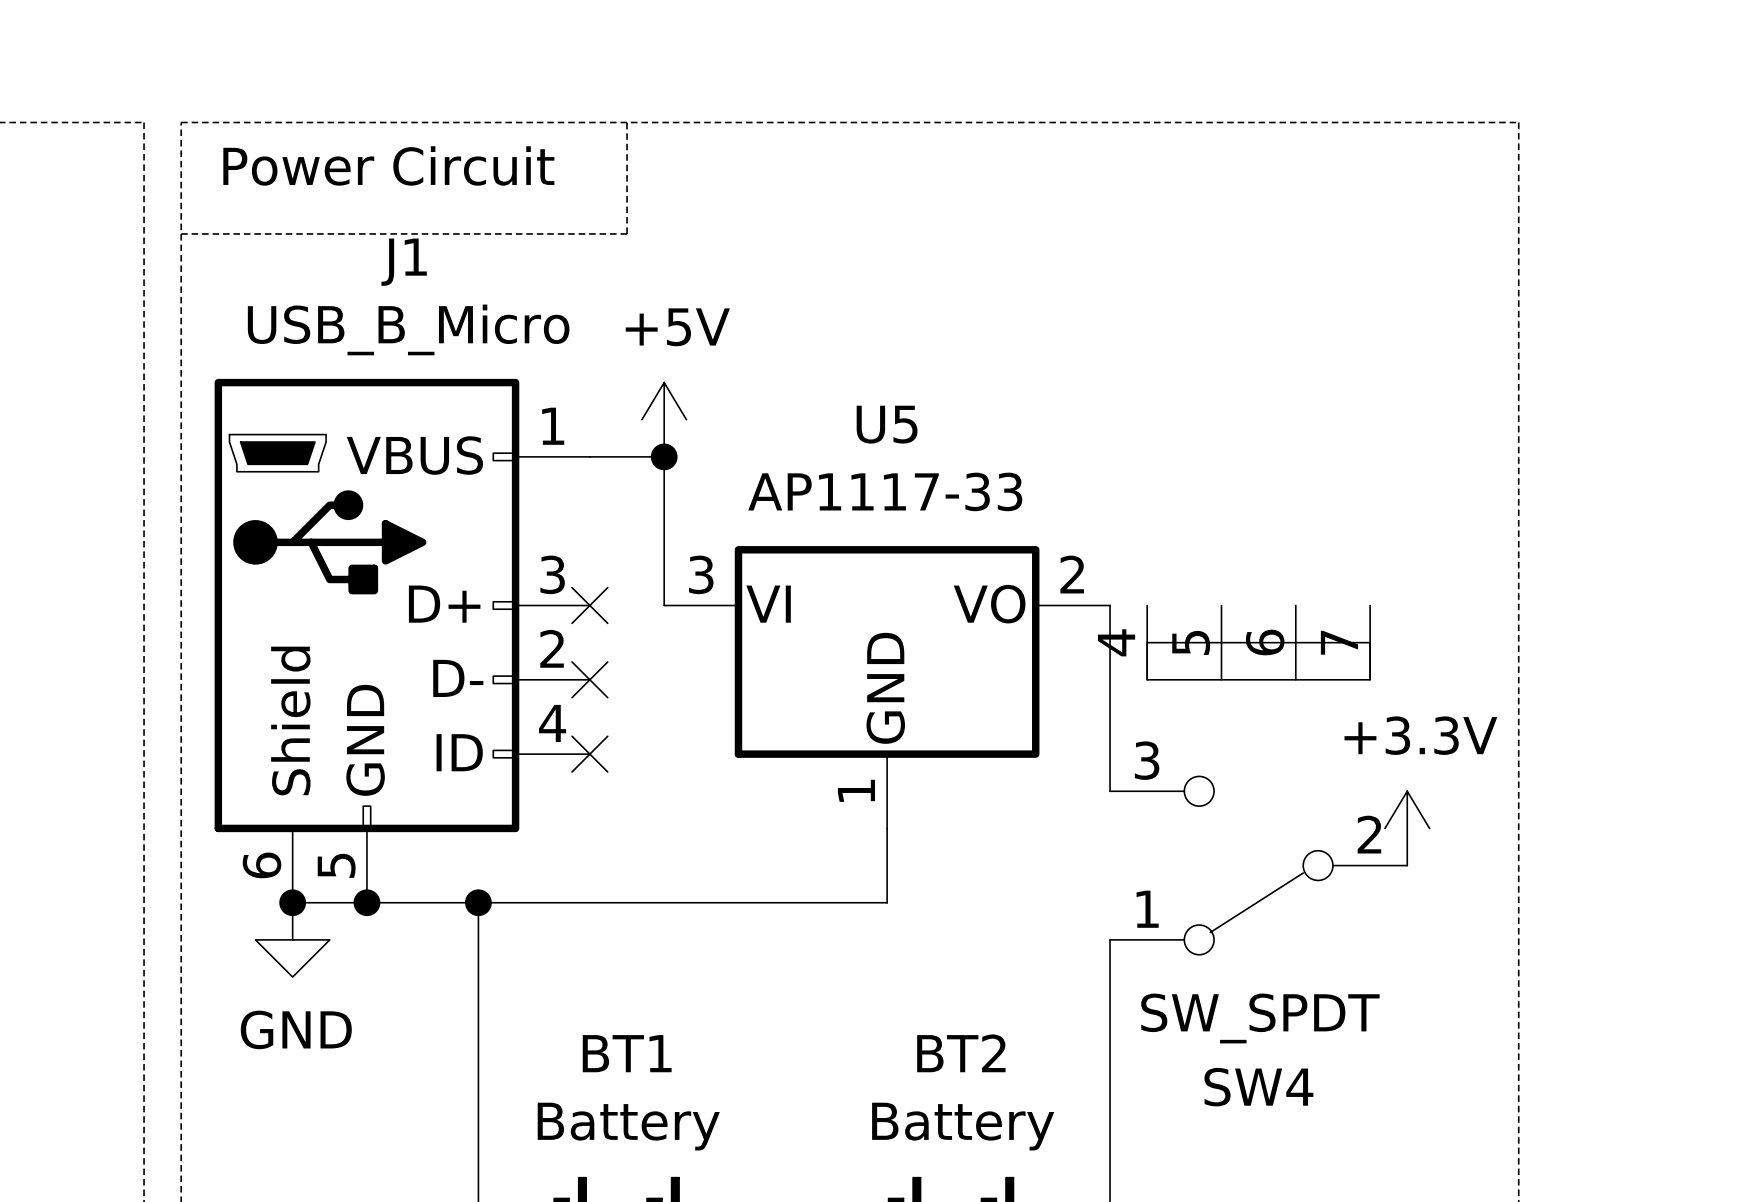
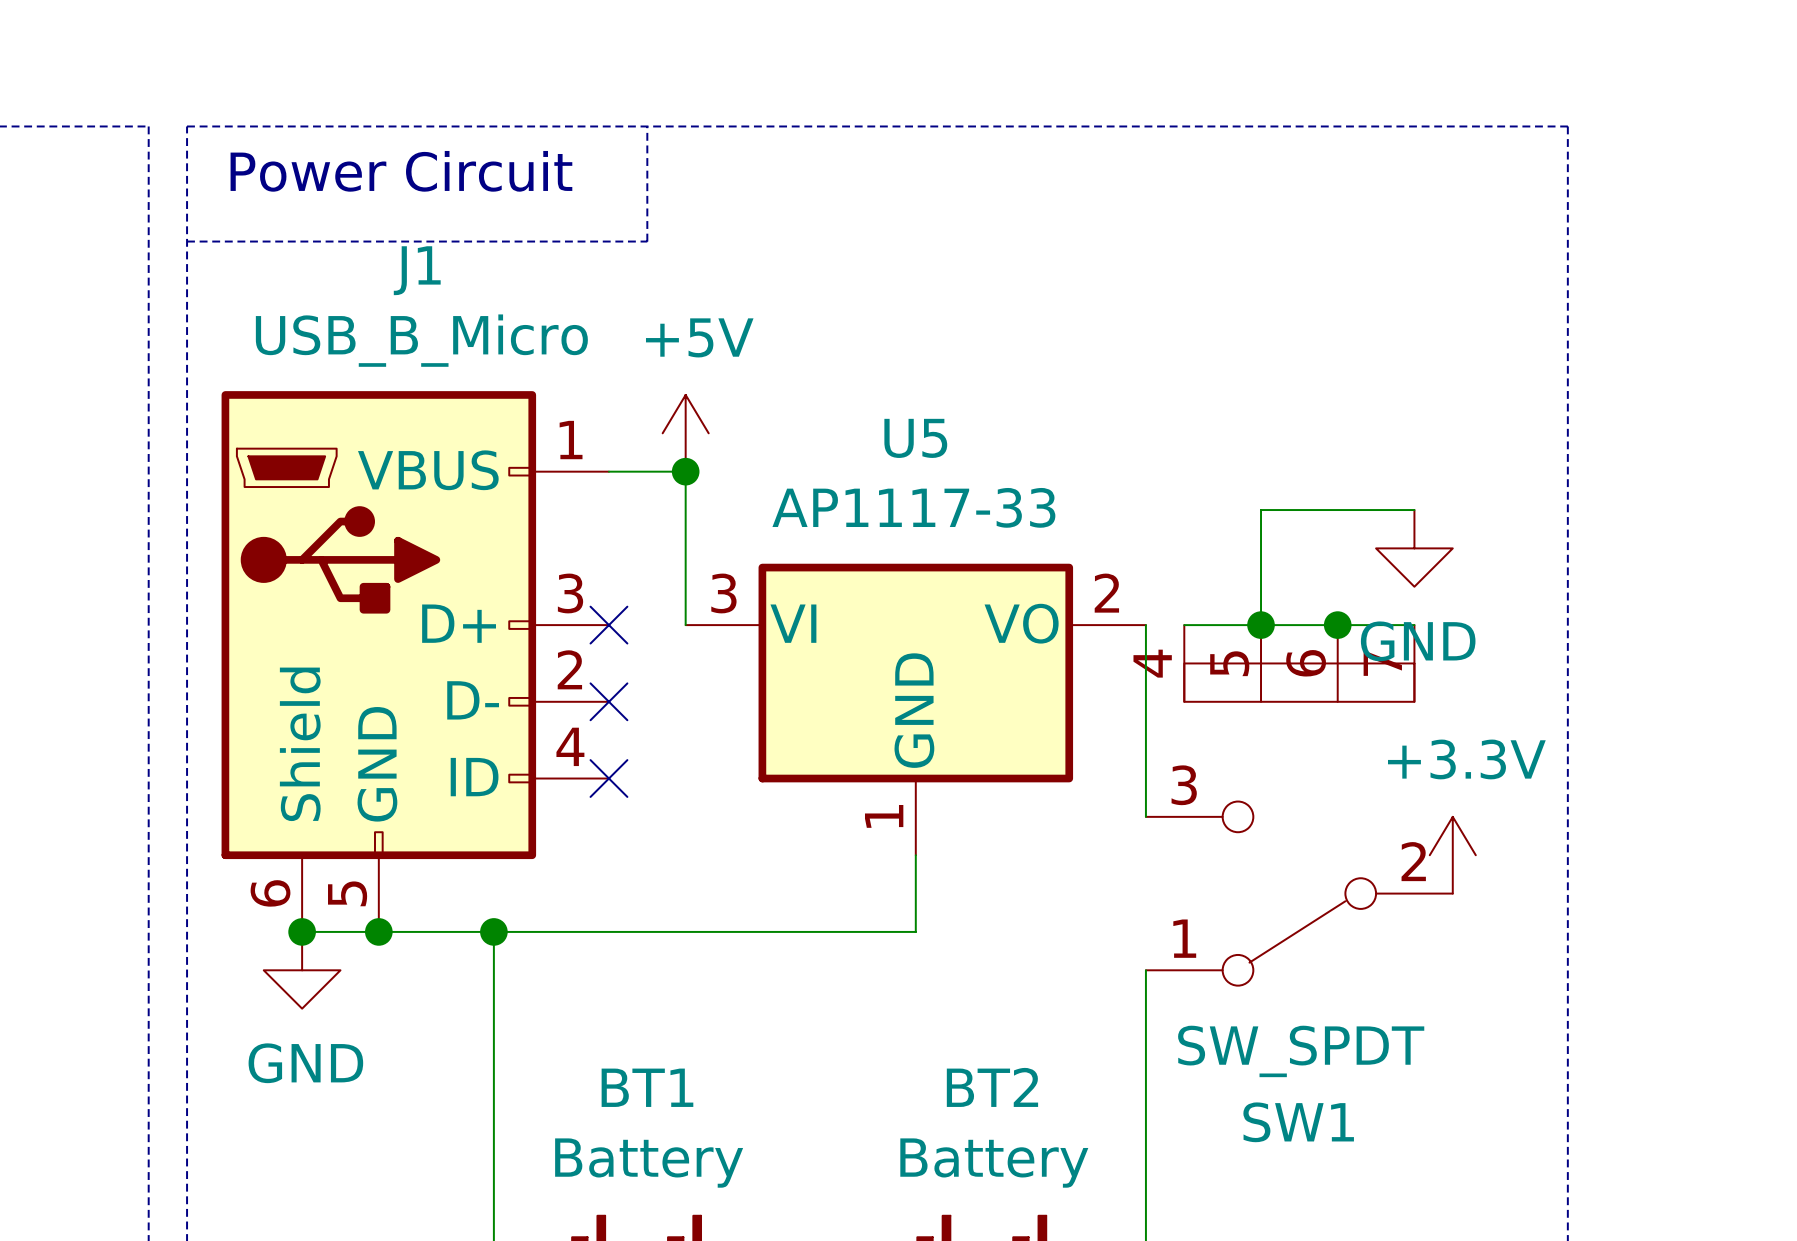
wire: none -> (1414, 510) (1261, 510) (1261, 625)
power symbol: none -> GND (1414, 548)
wire: none -> (1184, 625) (1414, 625)
junction: none -> (1261, 625)
junction: none -> (1337, 625)
SW4 name: SW4 (1258, 1087) -> SW1 (1298, 1122)

